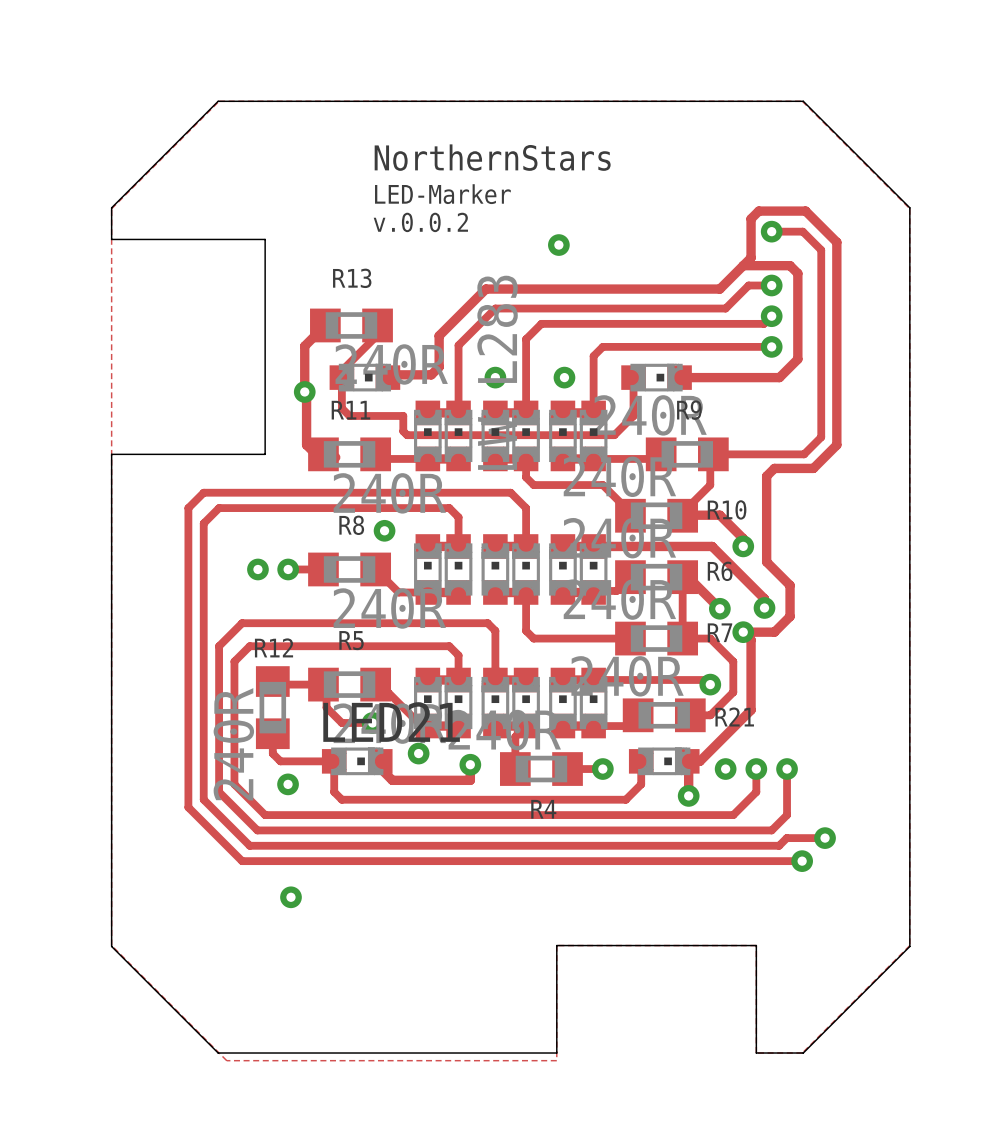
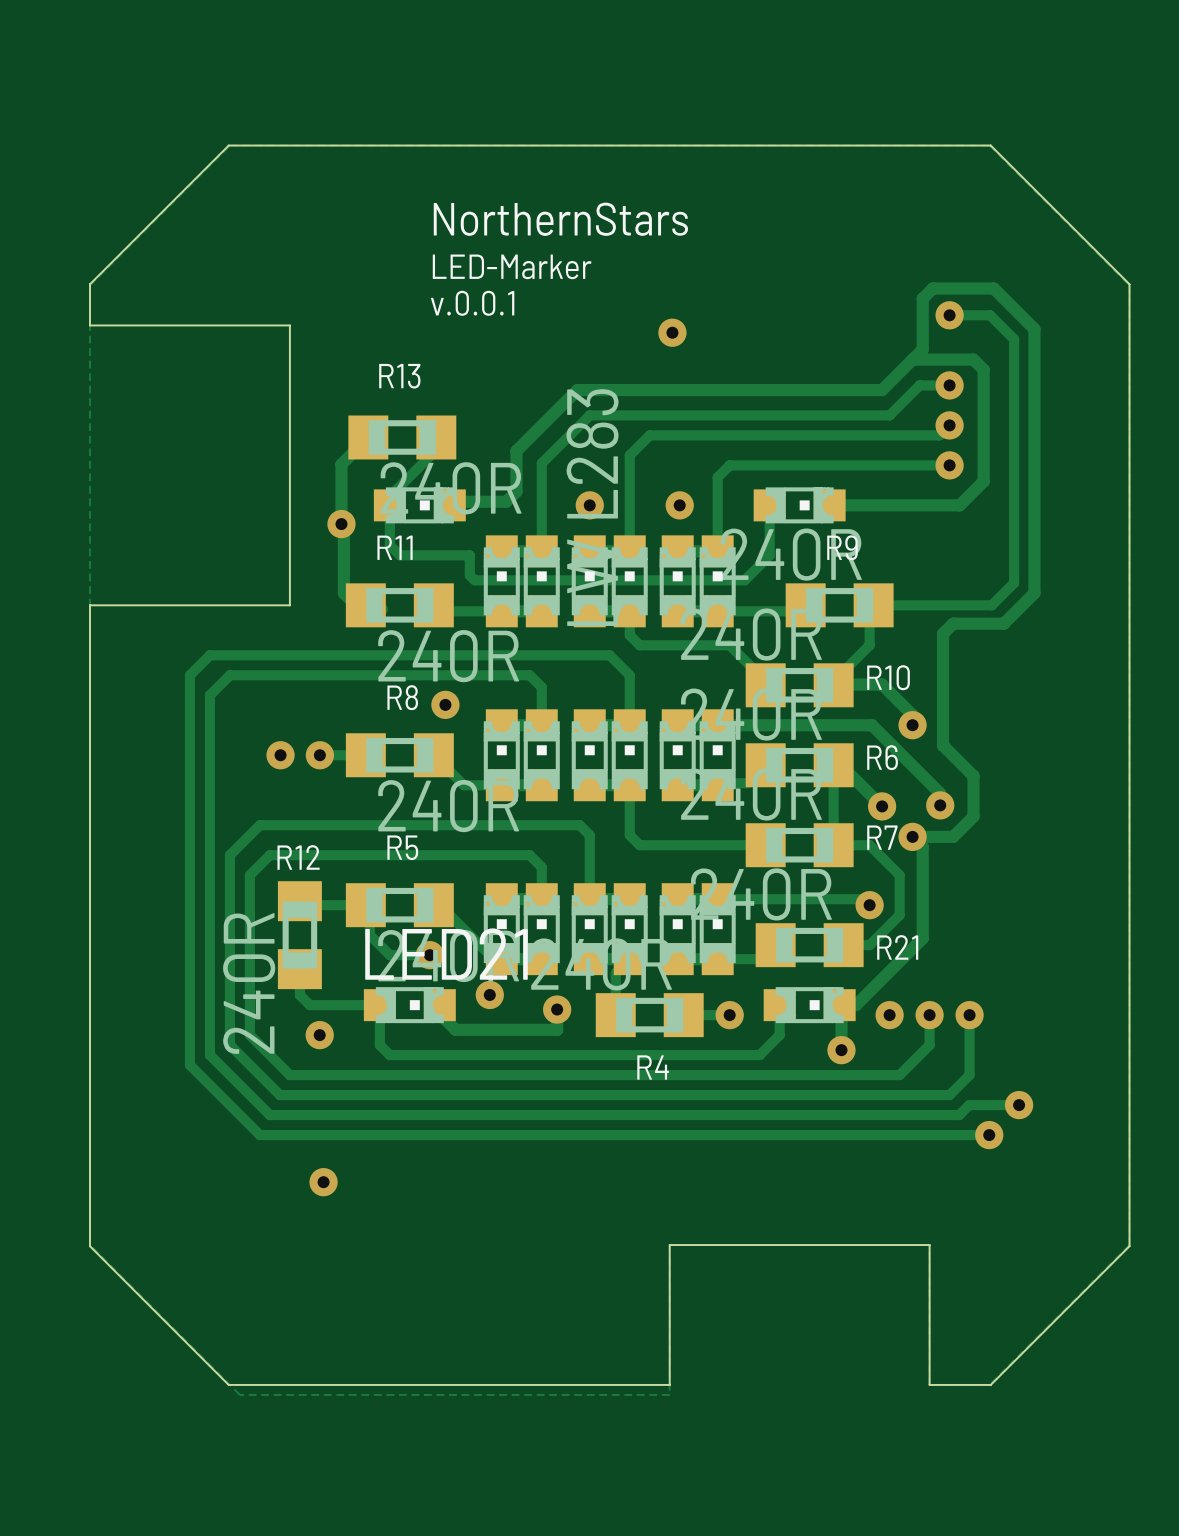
text: v.0.0.2 (420, 222) -> v.0.0.1 (472, 303)

